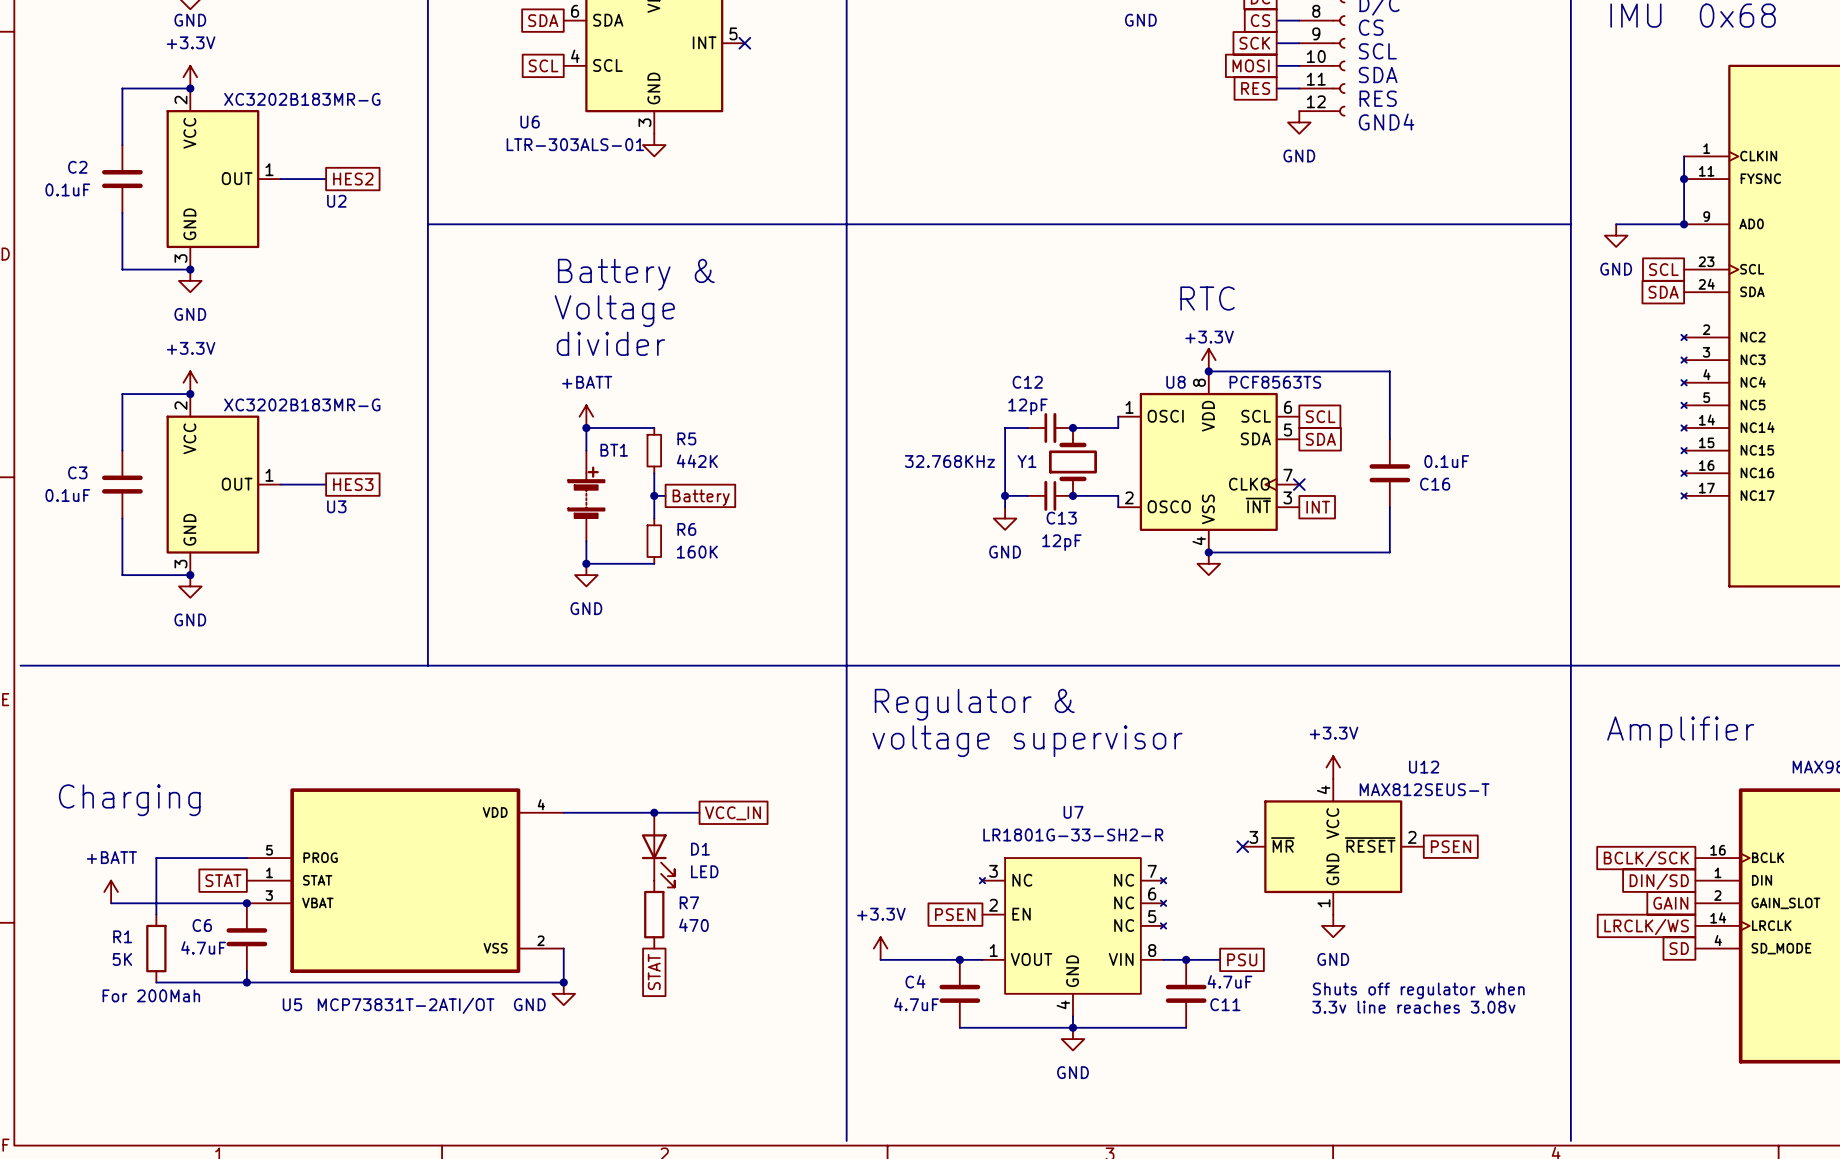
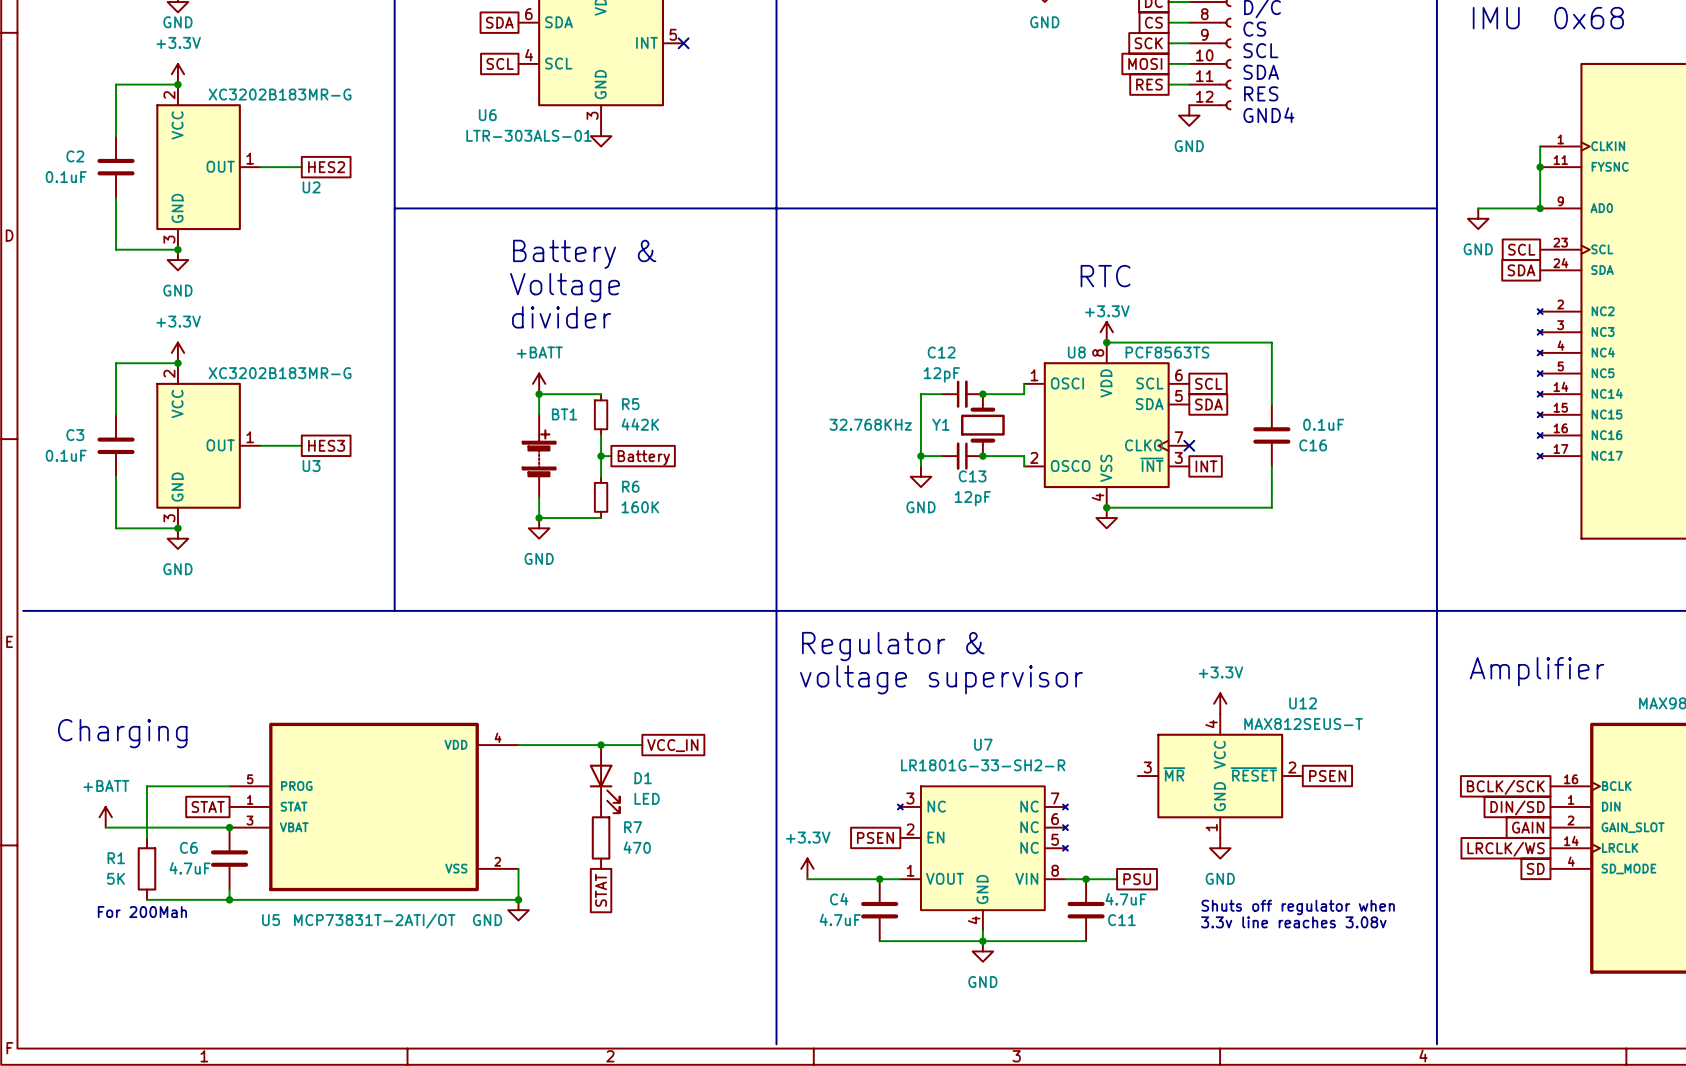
no-connect mark: (1242, 846) -> none

